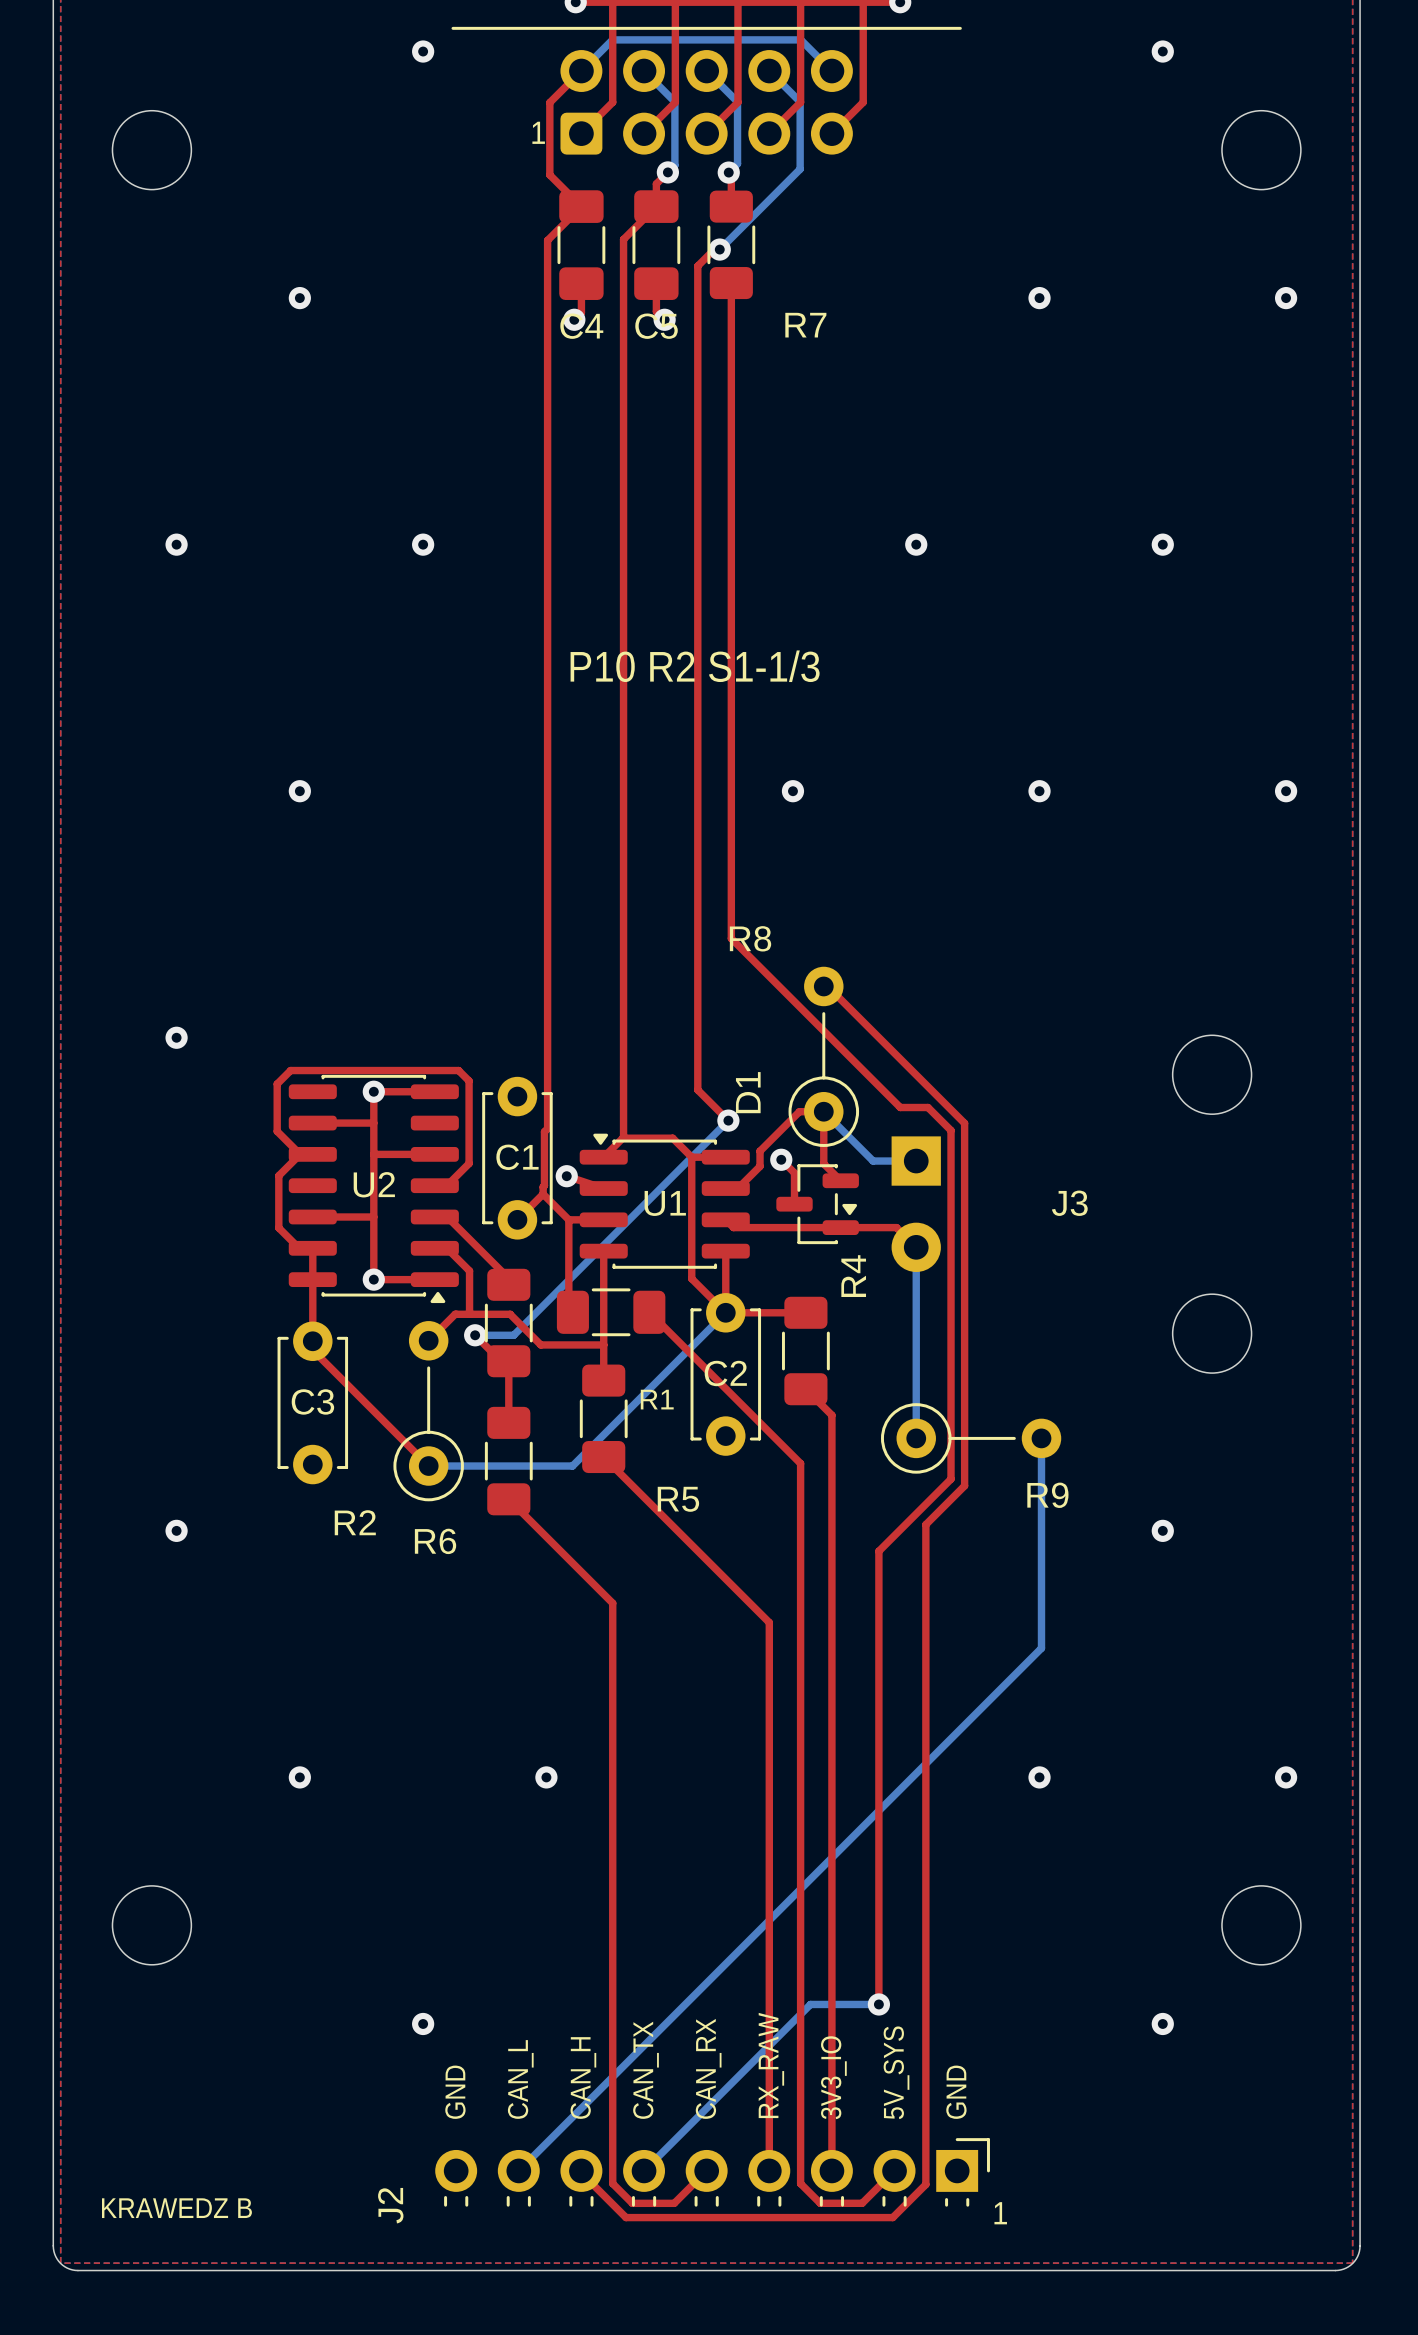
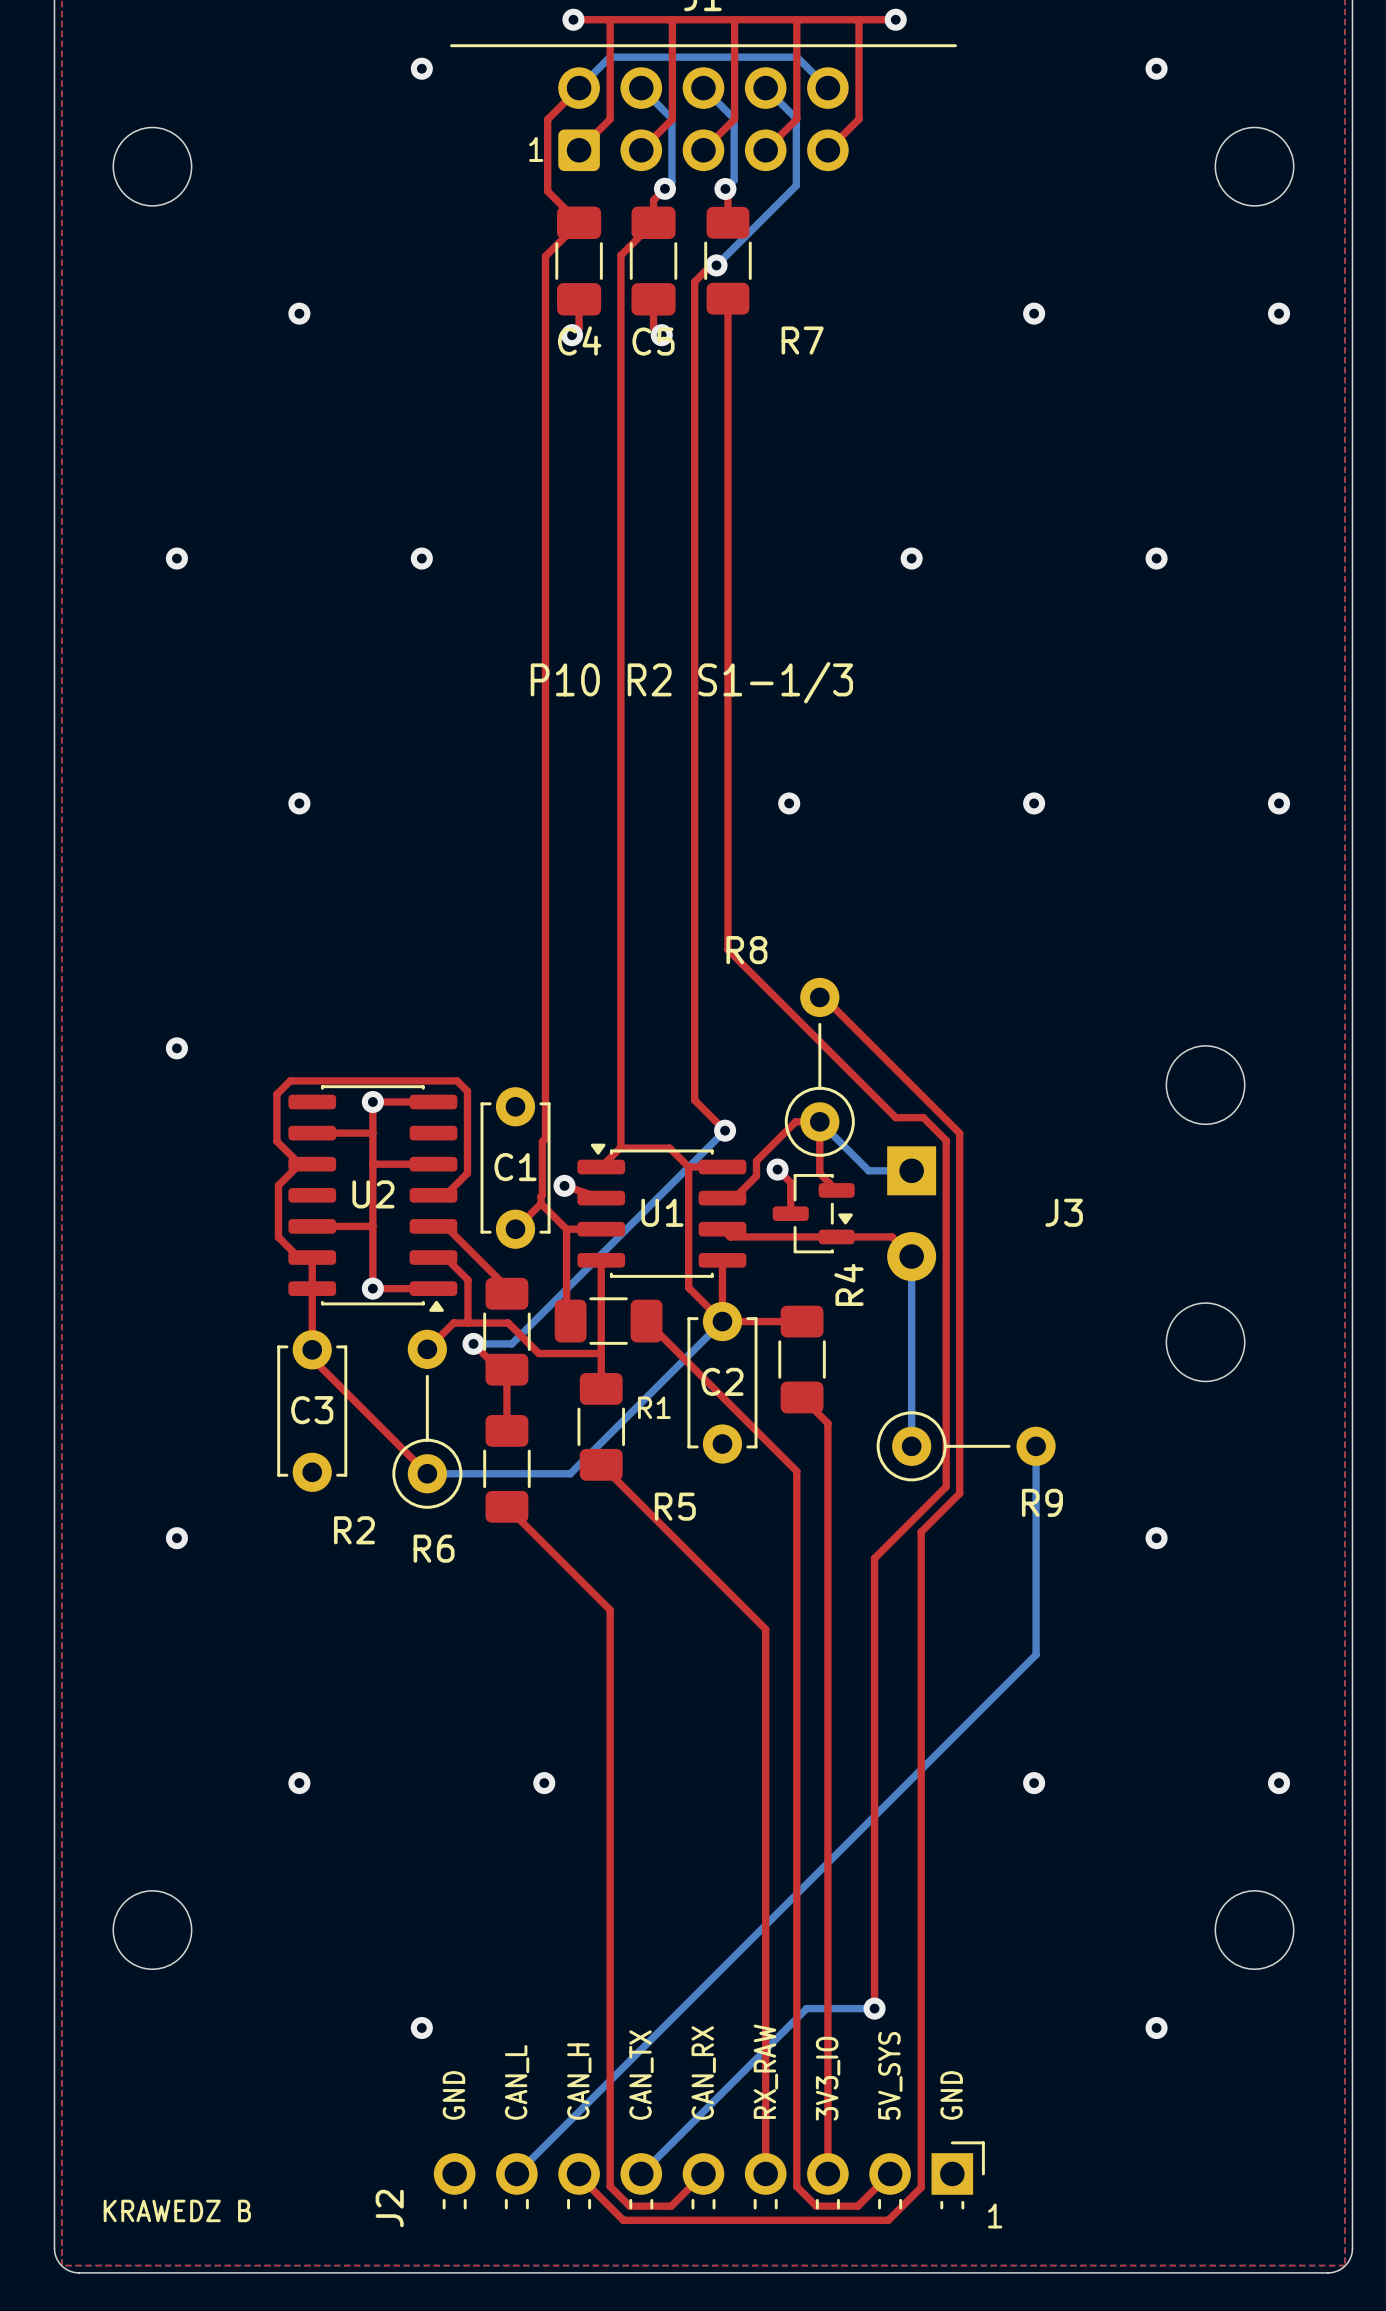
D1 name: D1 (748, 1092) -> none

